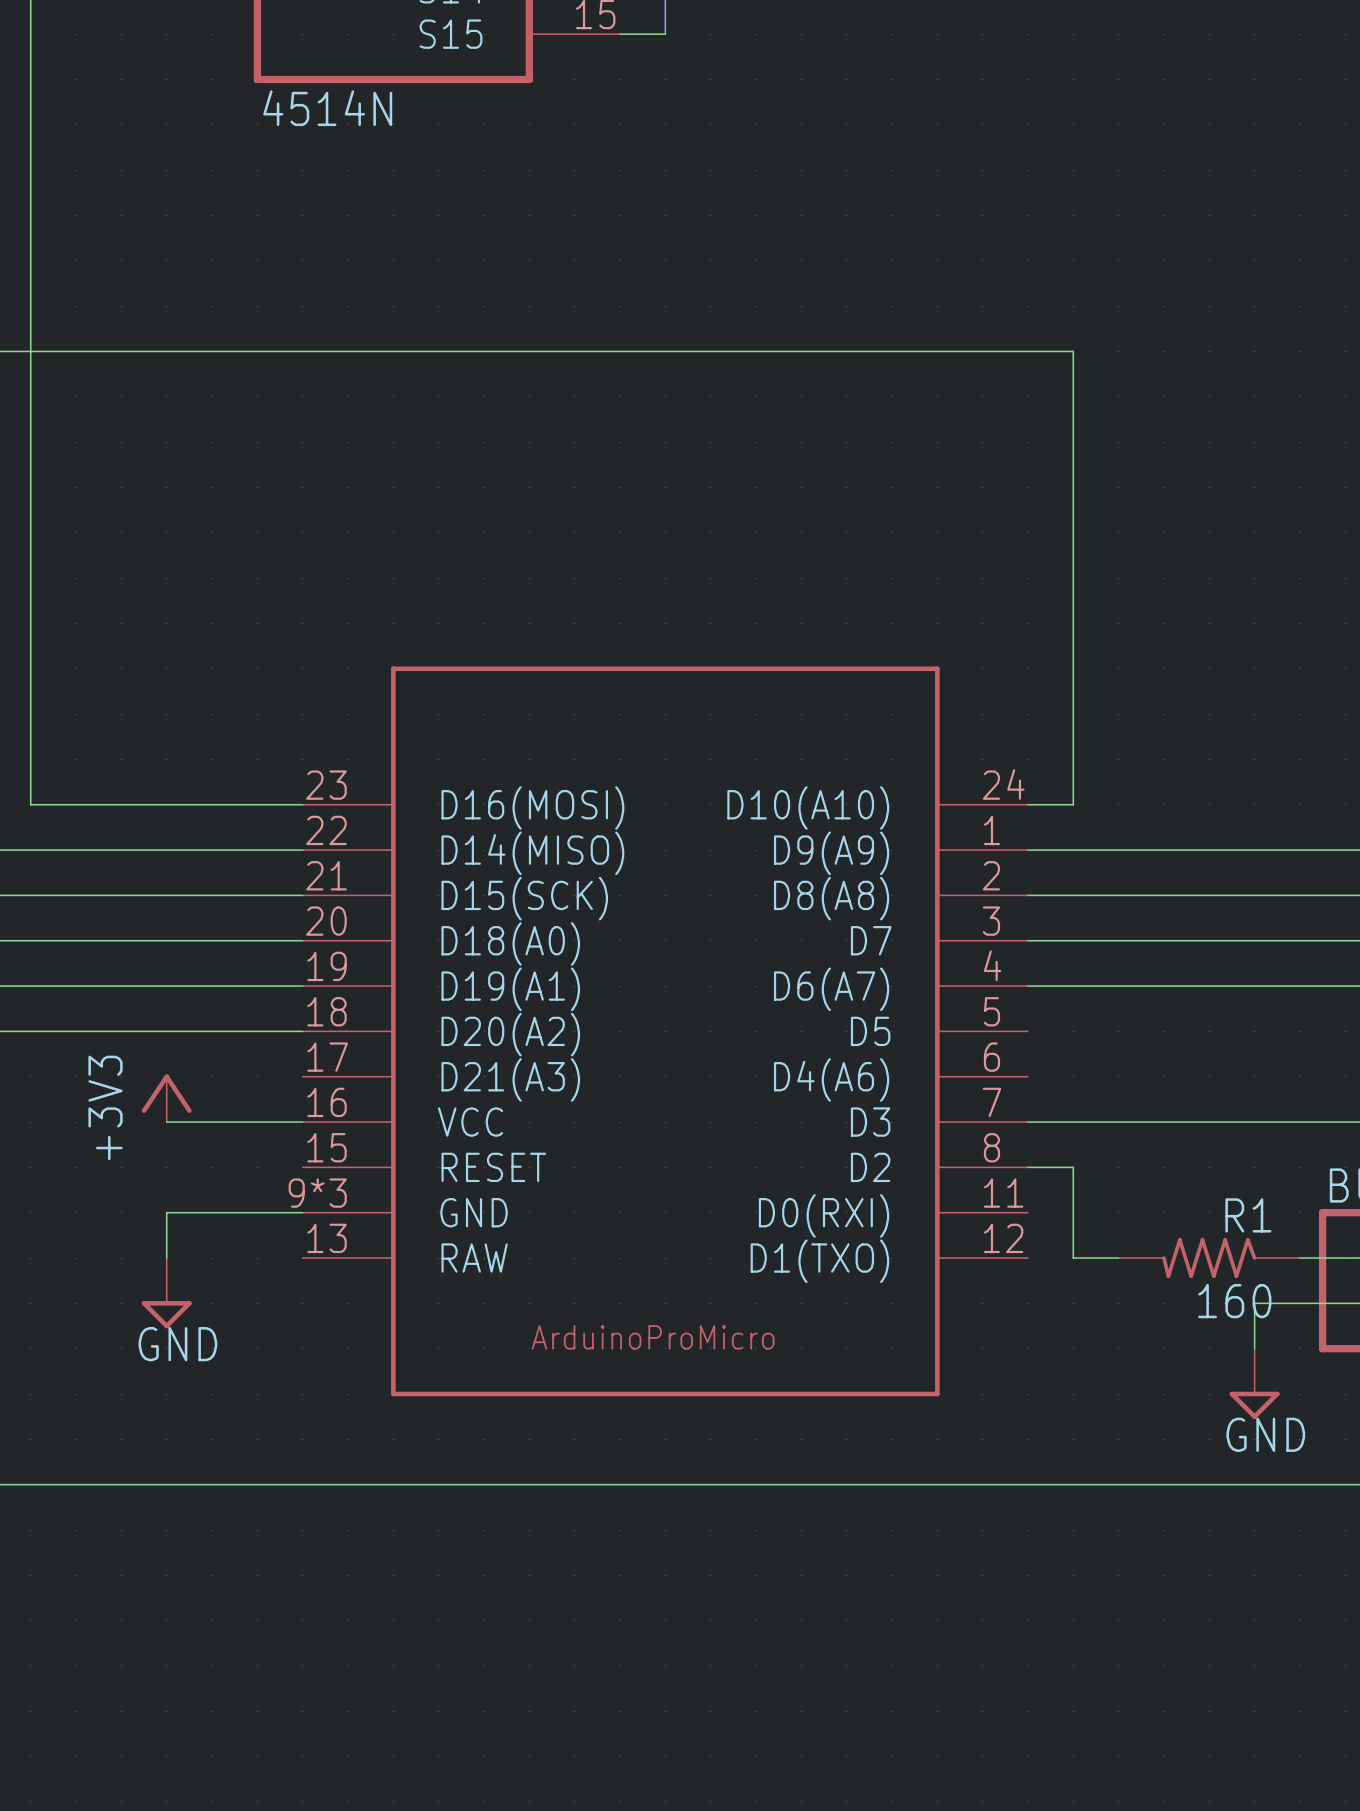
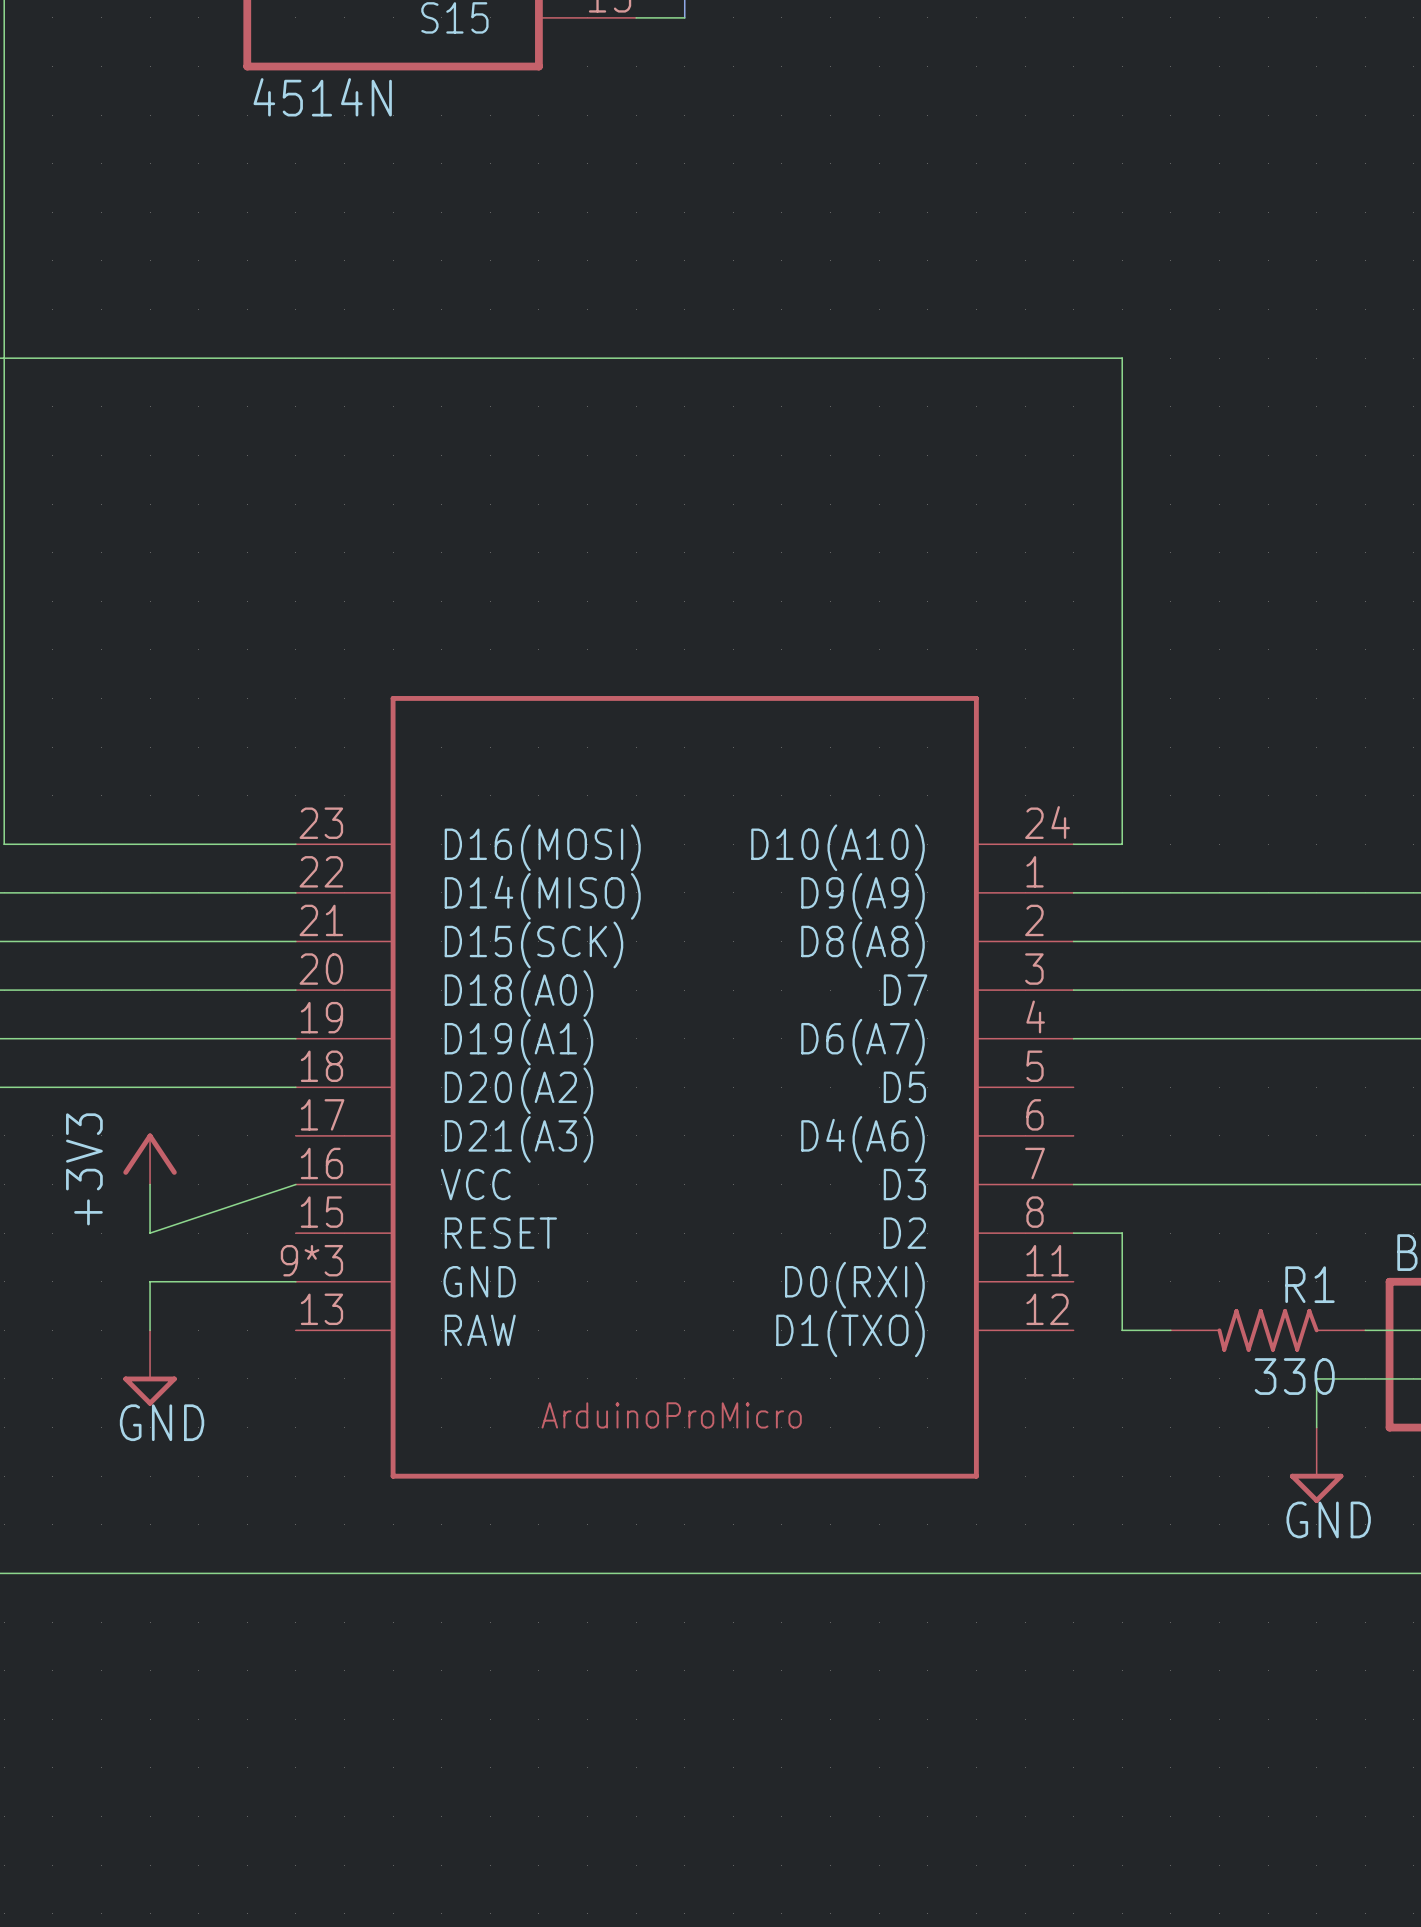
wire: (166, 1122) (302, 1122) -> (150, 1184) (150, 1233) (295, 1184)
R1 value: 160 (1234, 1301) -> 330 (1294, 1376)

